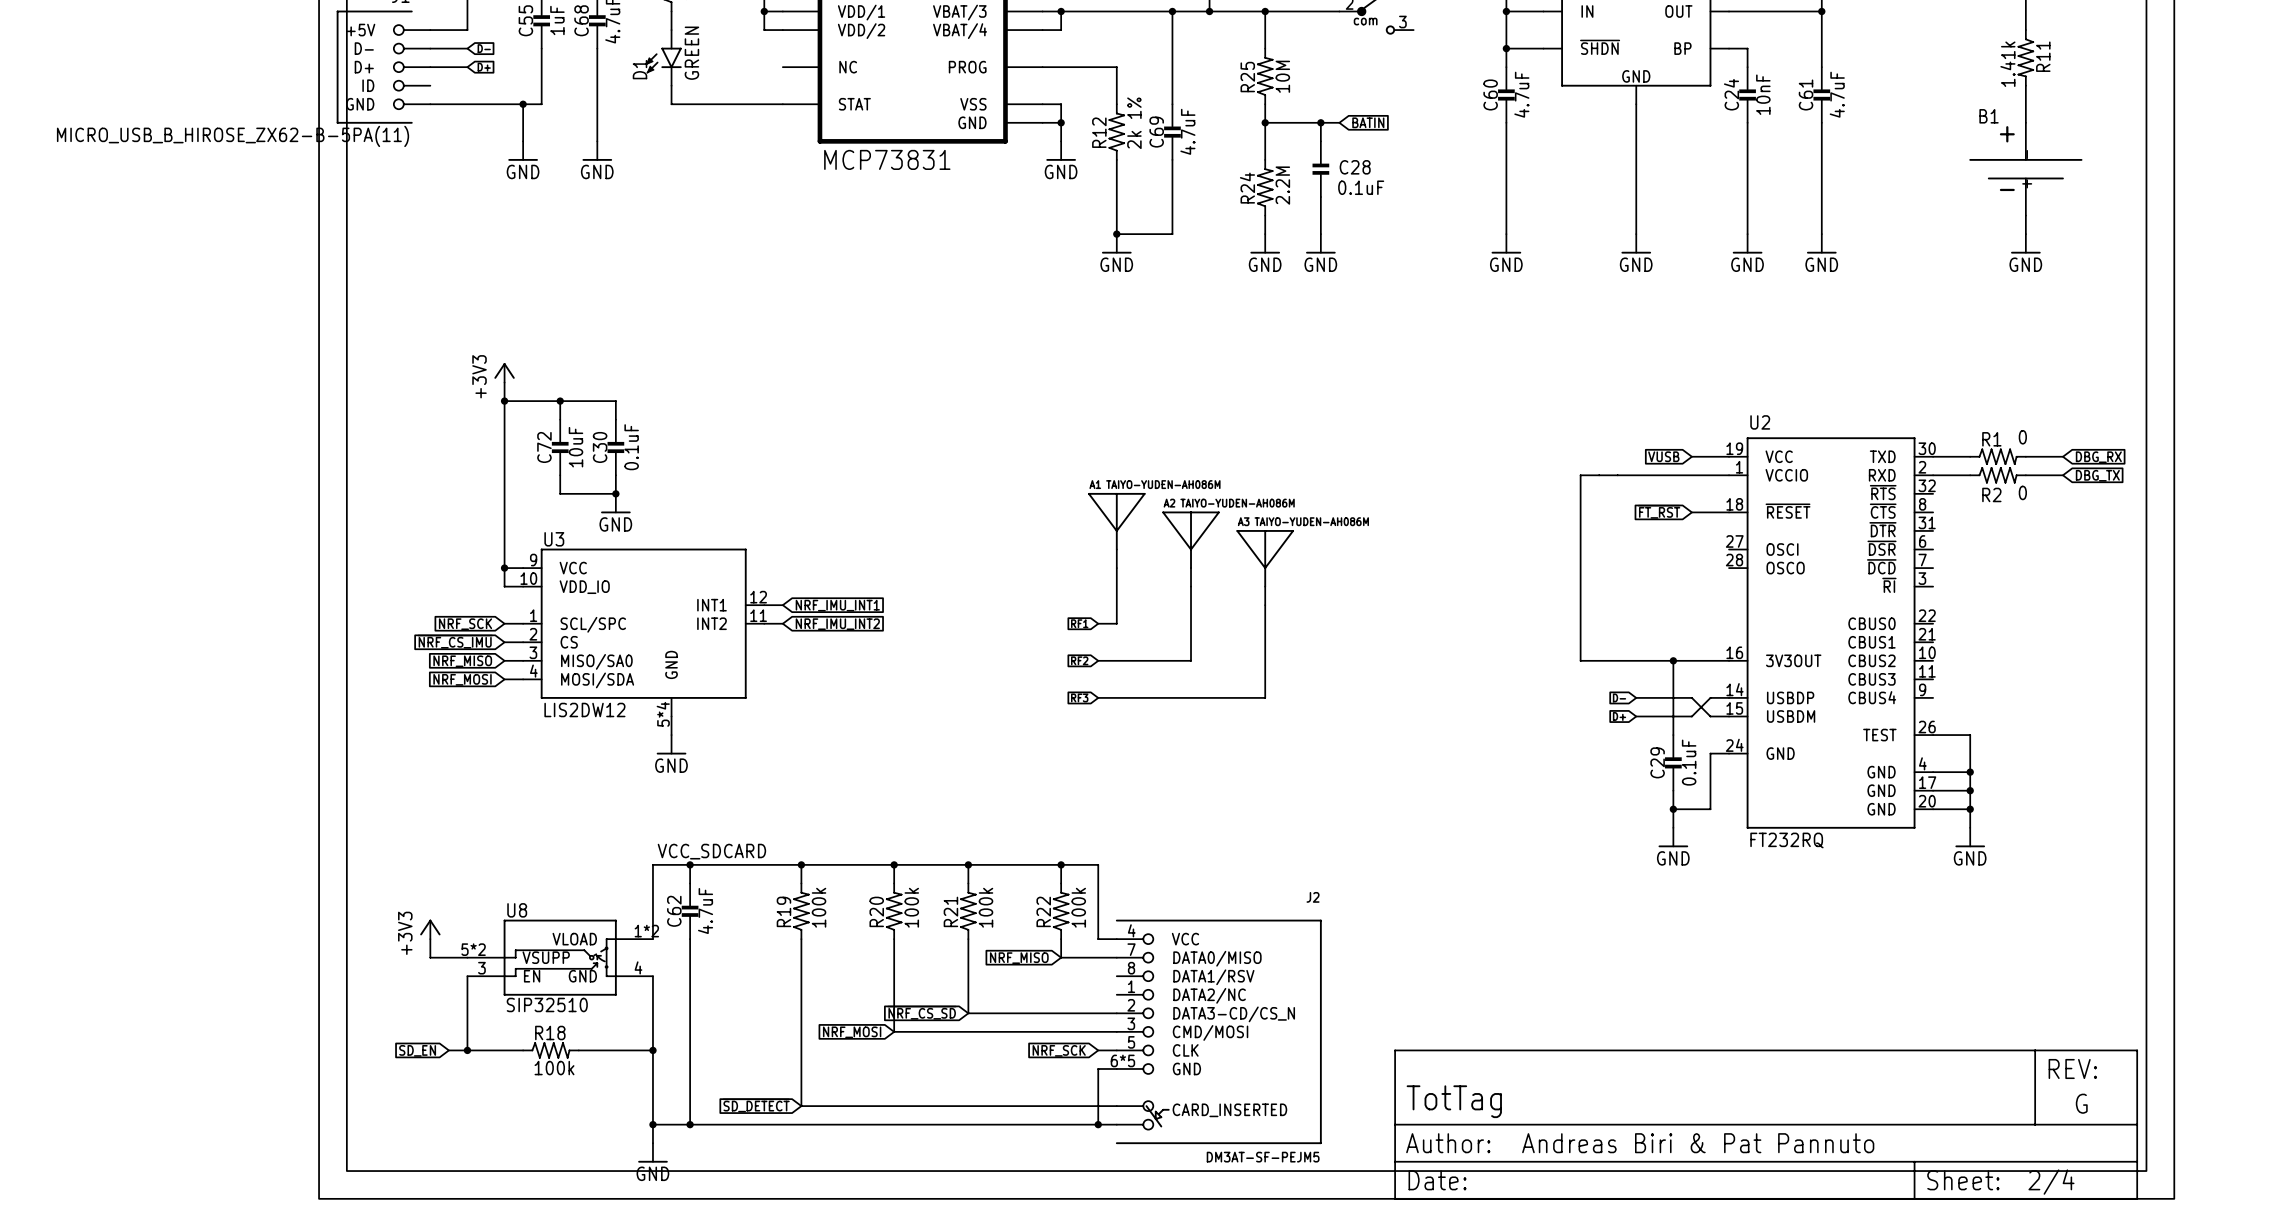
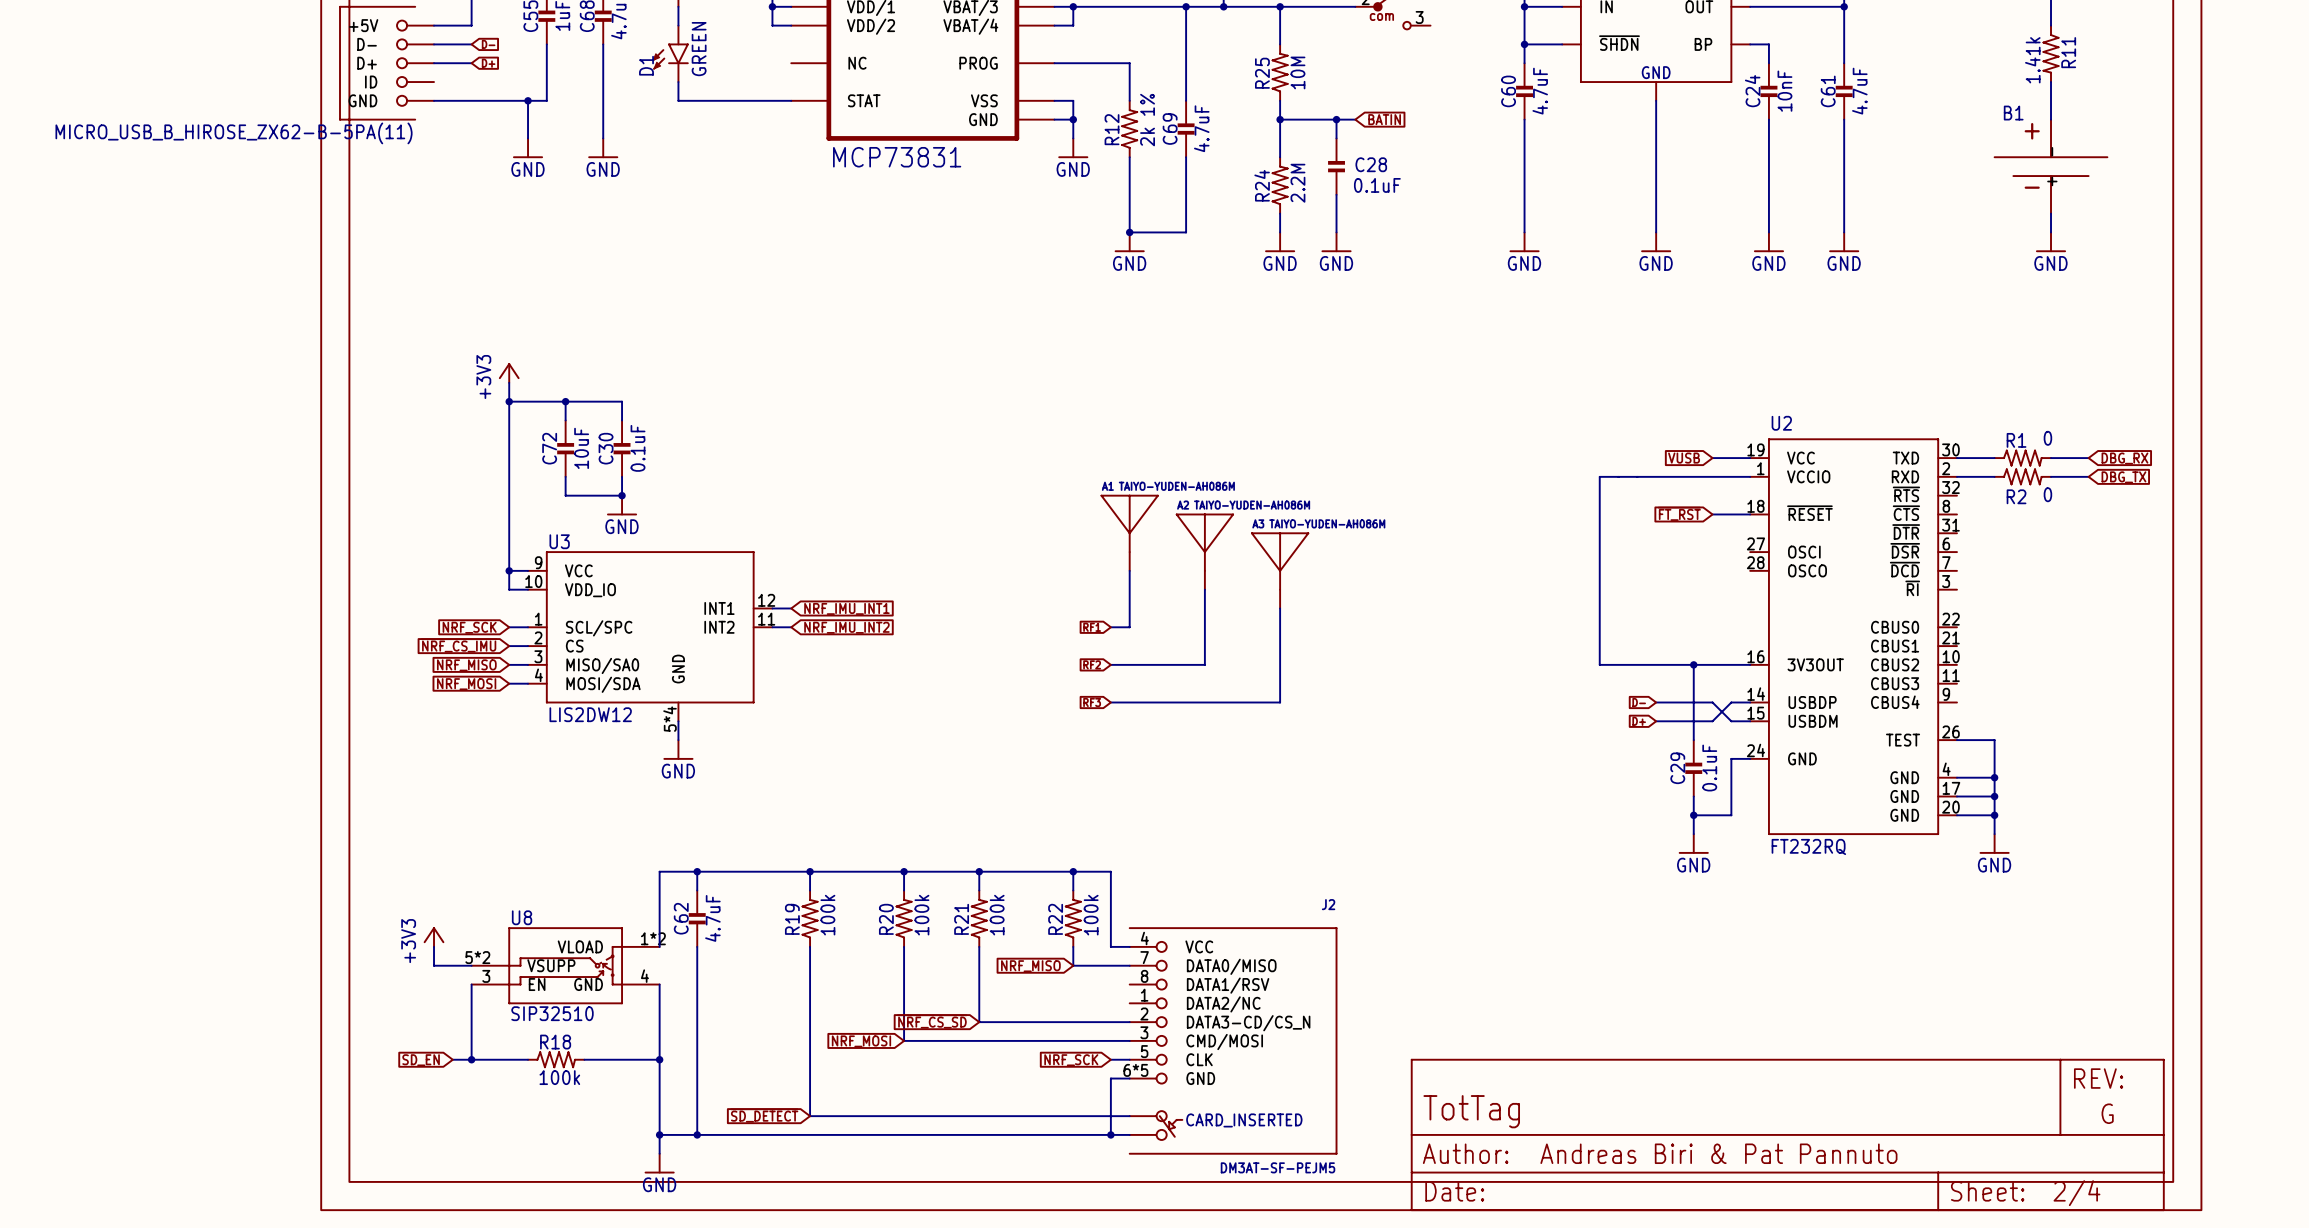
label: VCC_SDCARD (711, 851) -> none

